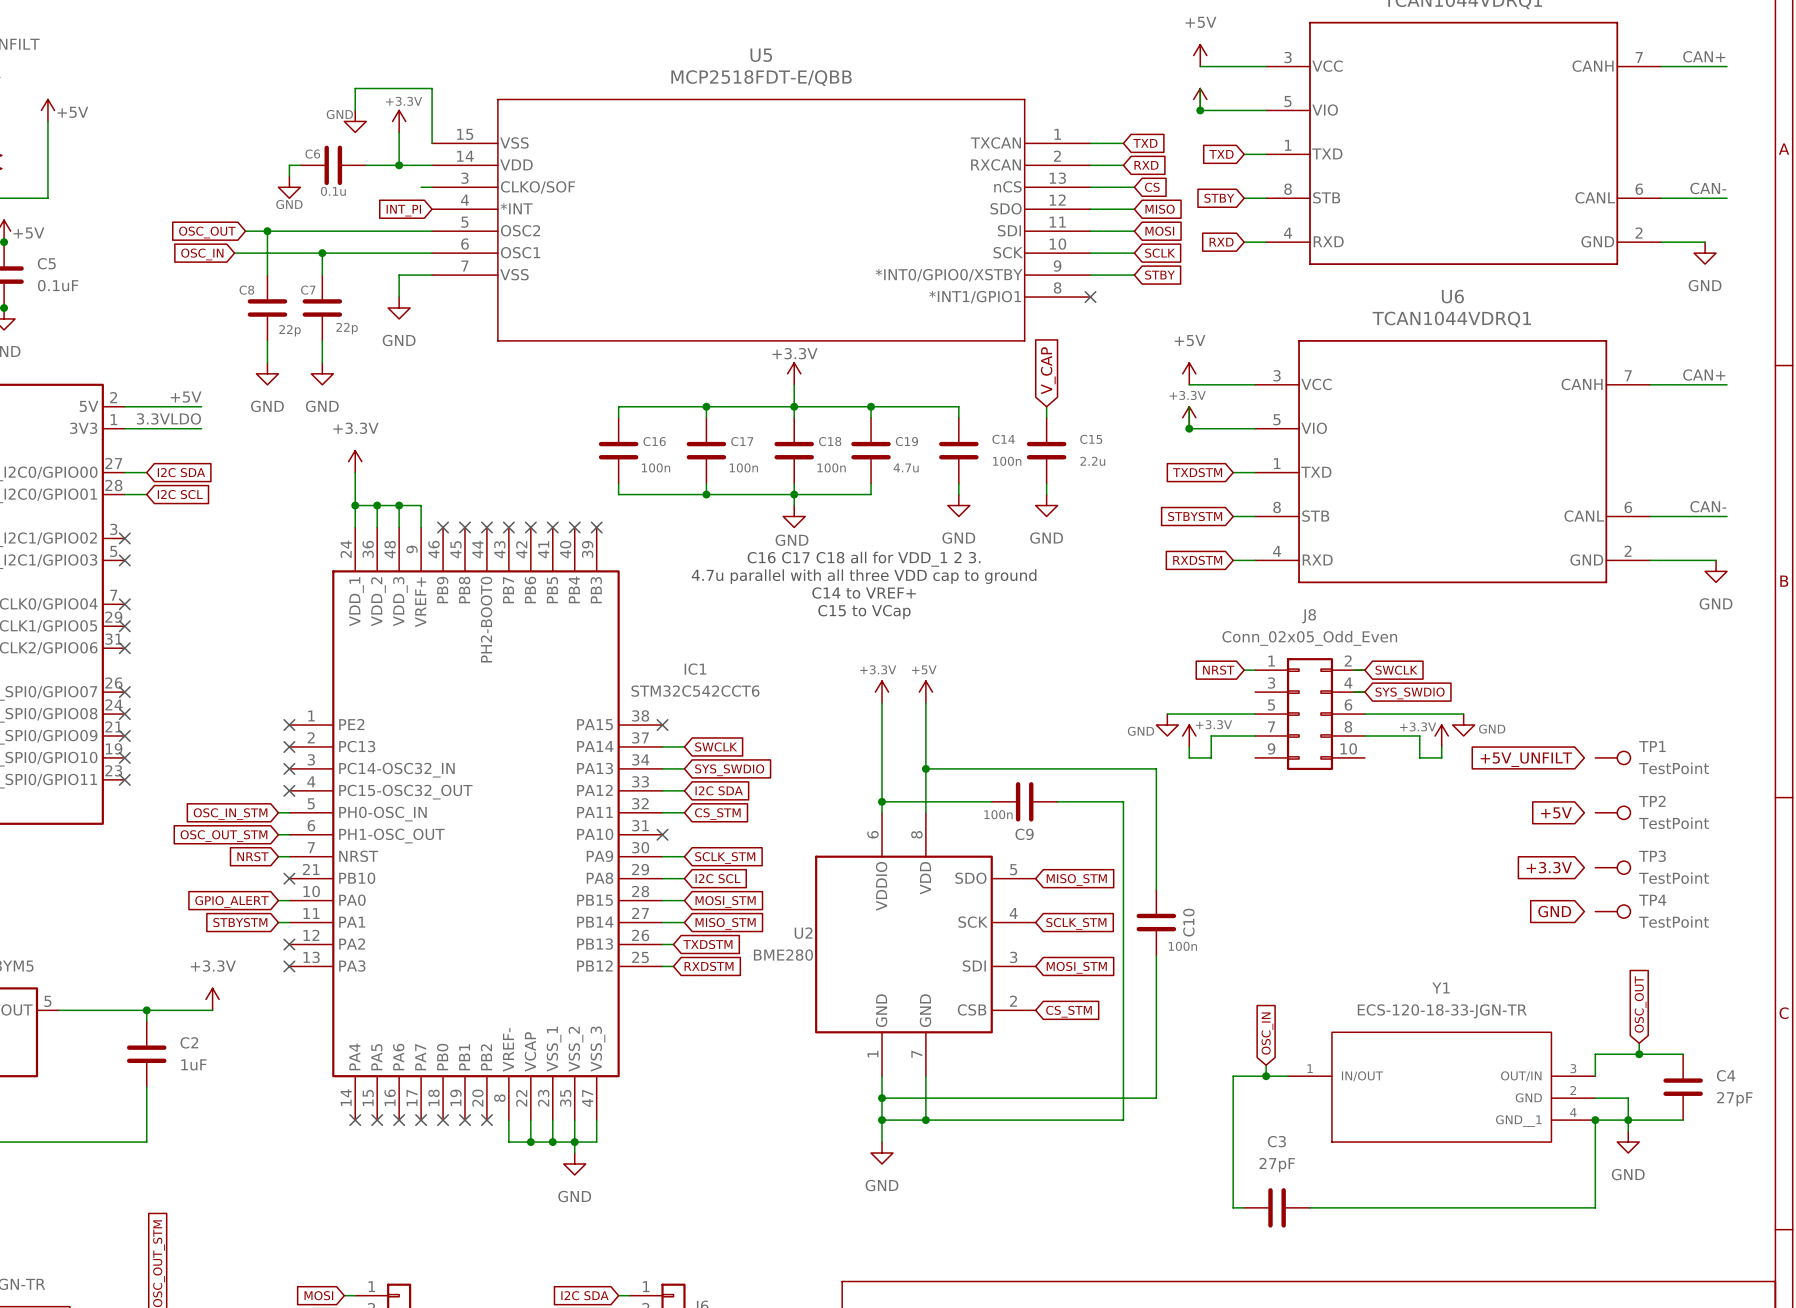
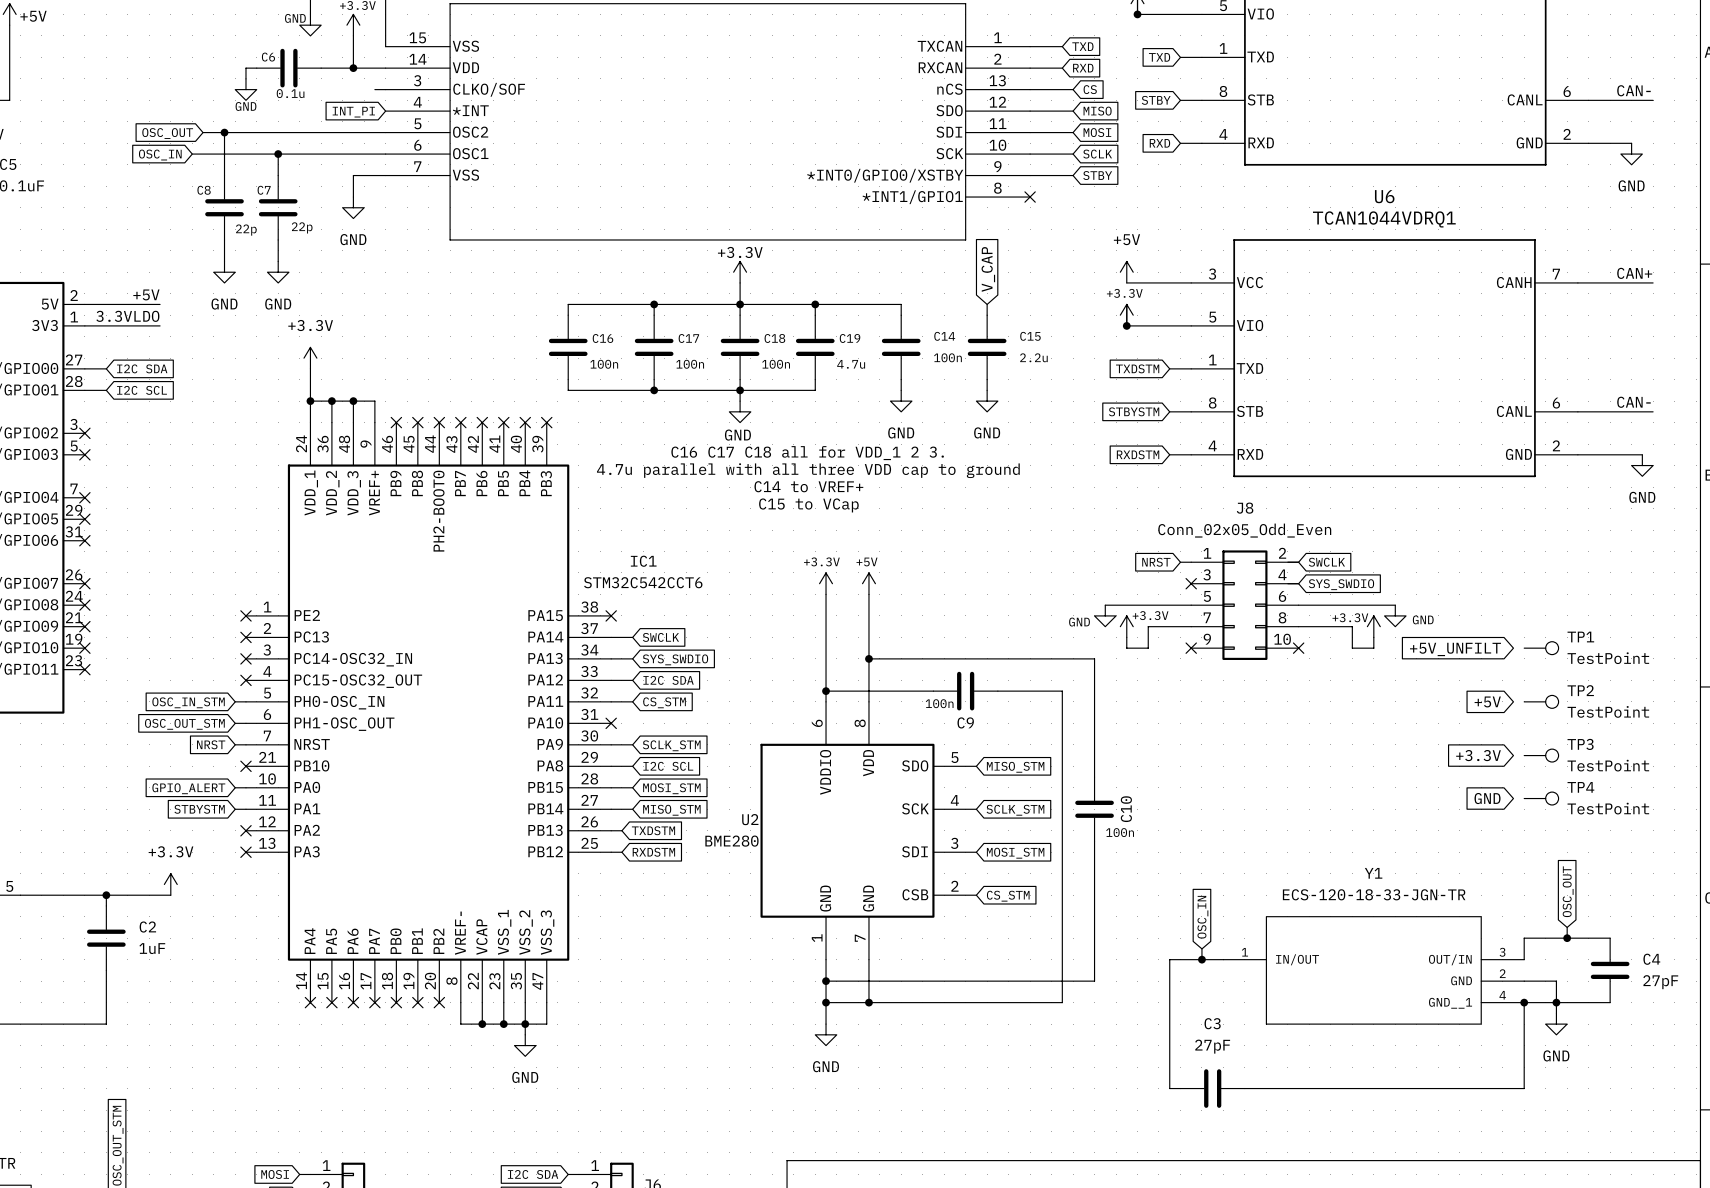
no-connect mark: none -> (1191, 583)
no-connect mark: none -> (1191, 648)
no-connect mark: none -> (1298, 648)

